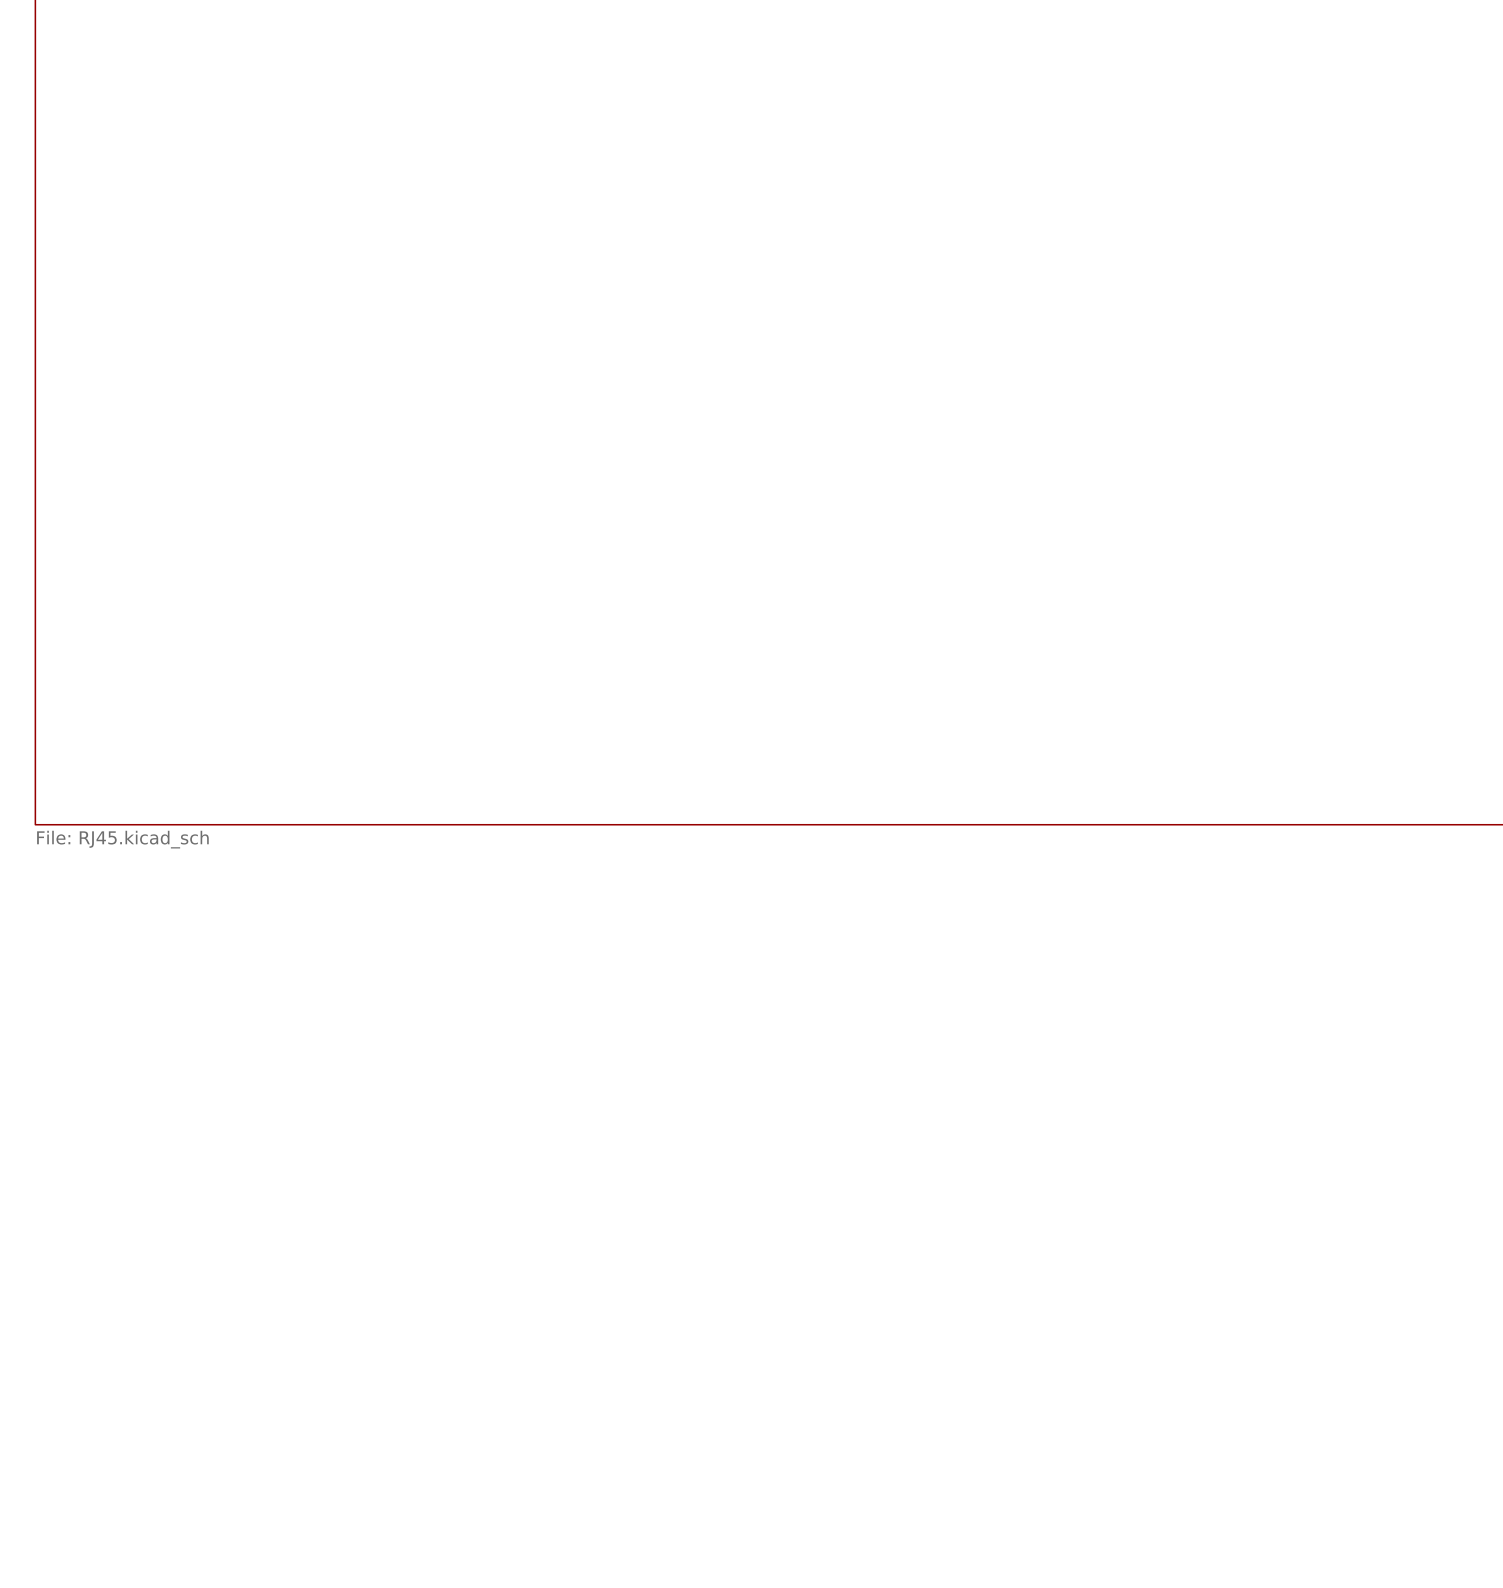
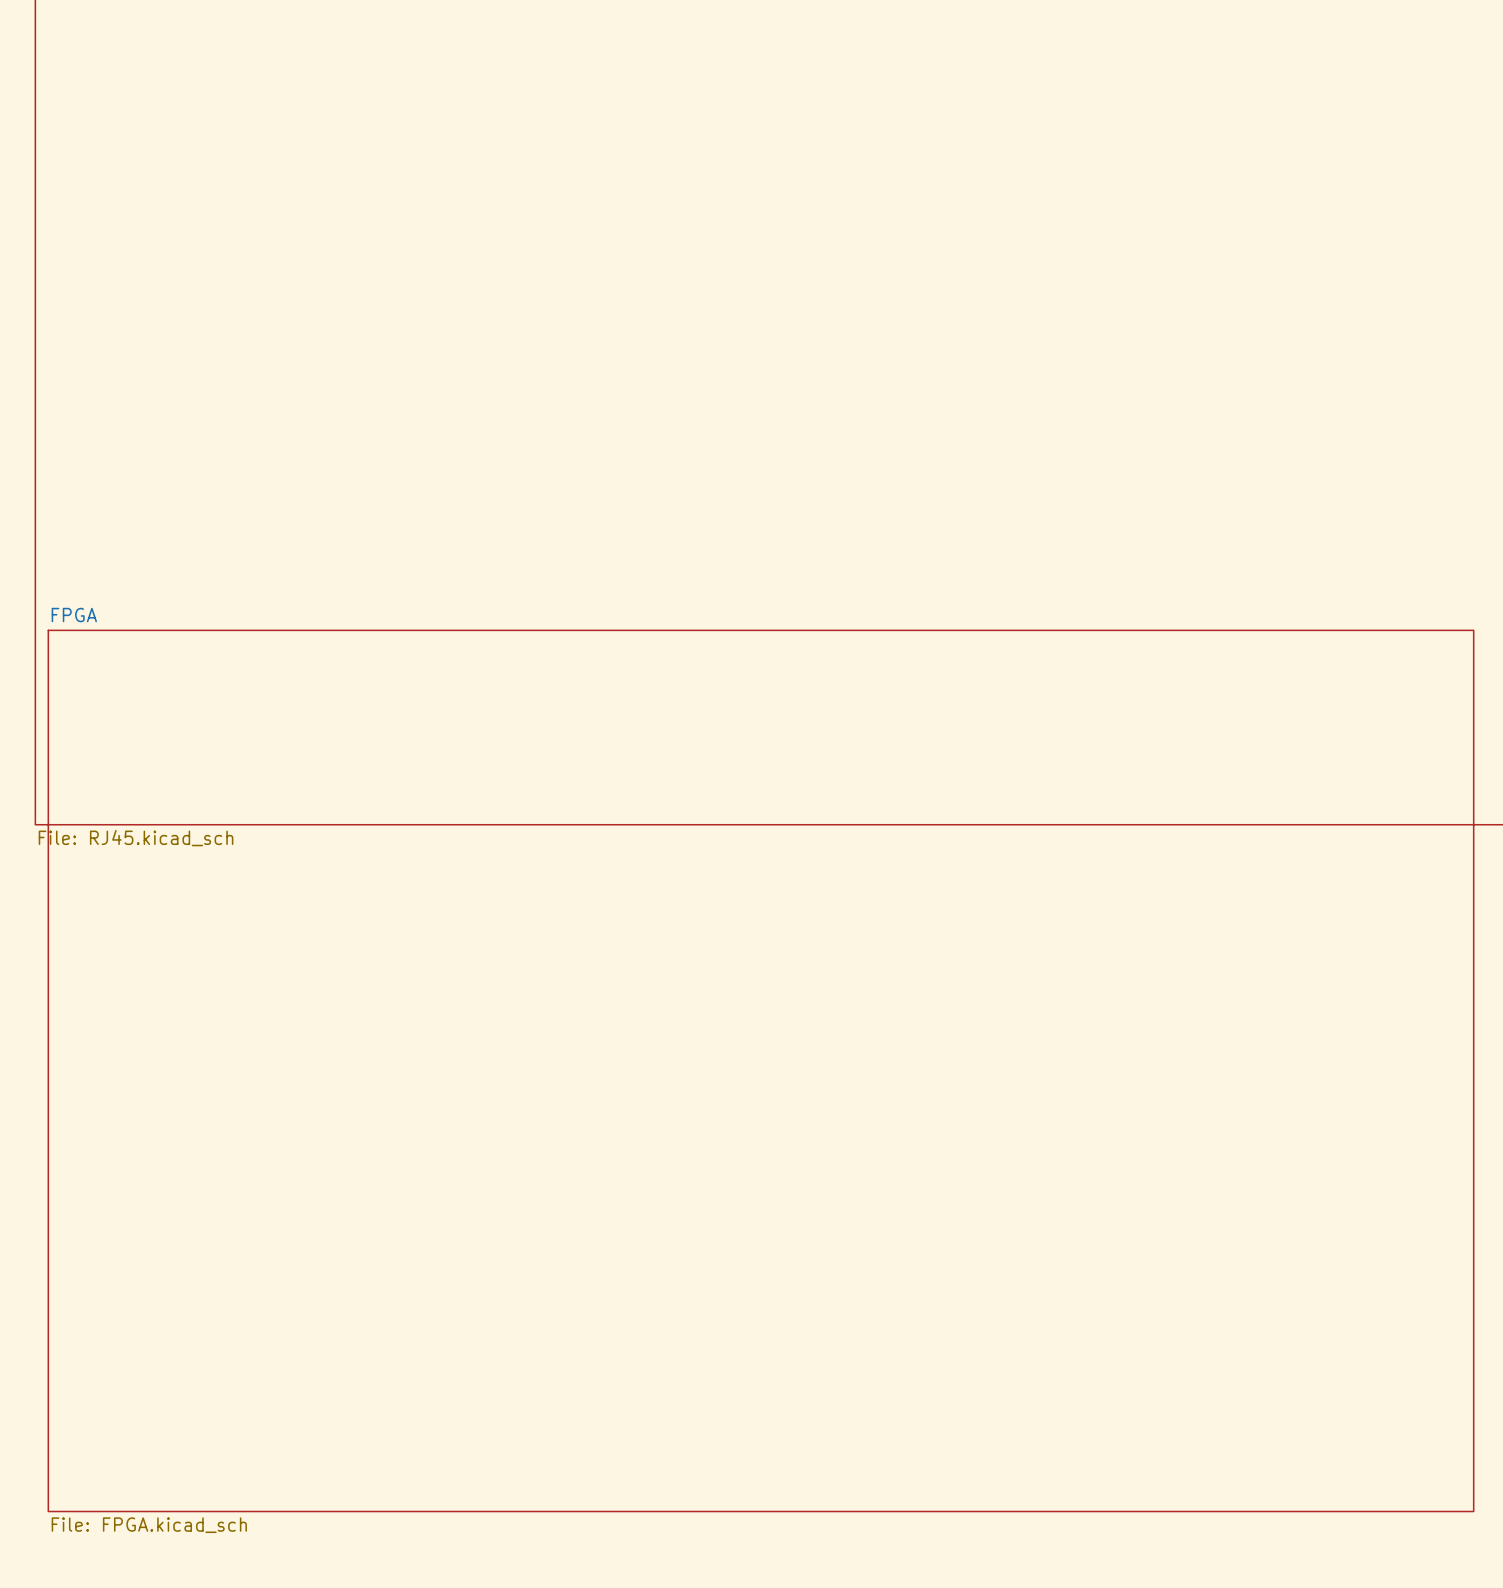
sheet FPGA: none -> File: FPGA.kicad_sch (761, 1070)

